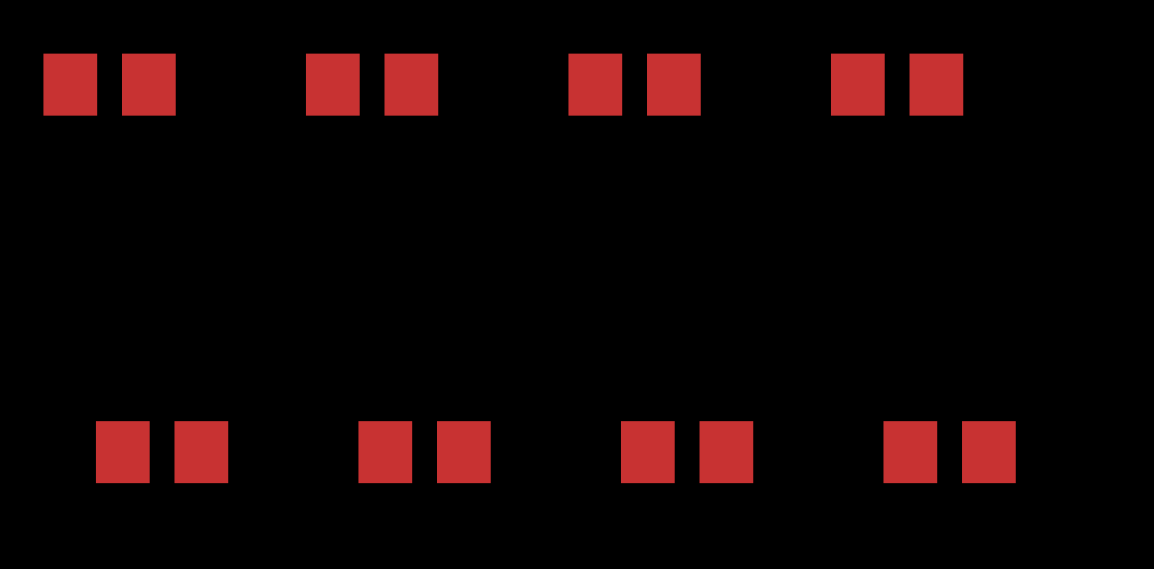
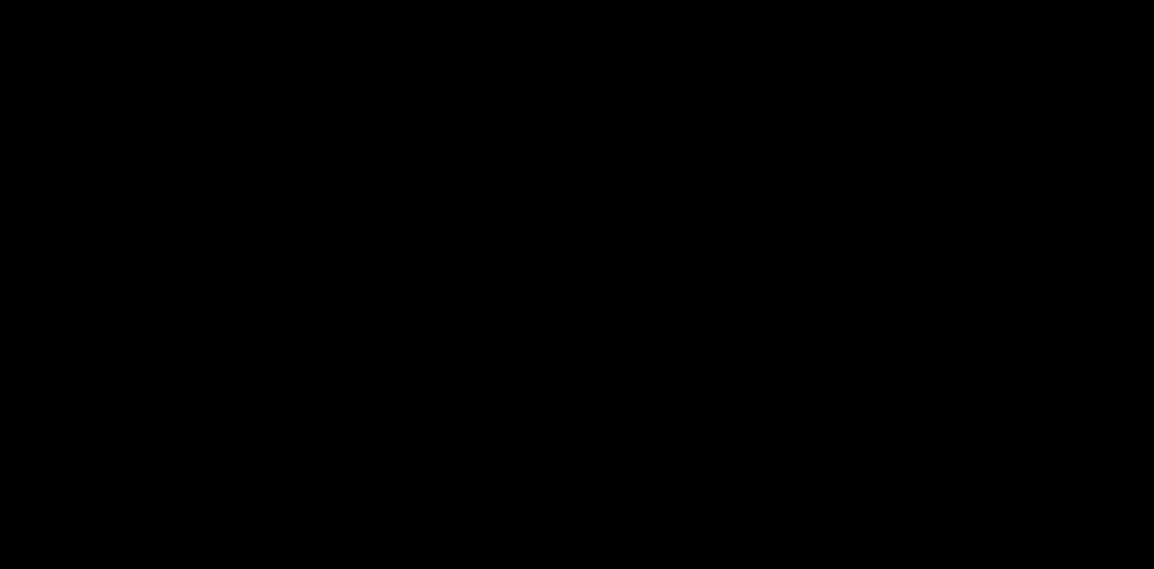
part: (109, 84) -> none
part: (372, 84) -> none
part: (634, 84) -> none
part: (897, 84) -> none
part: (162, 452) -> none
part: (424, 452) -> none
part: (687, 452) -> none
part: (949, 452) -> none

